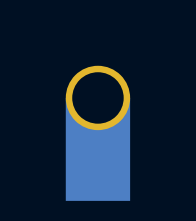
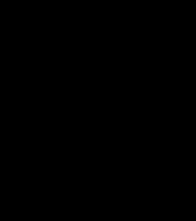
part: (97, 133) -> none

